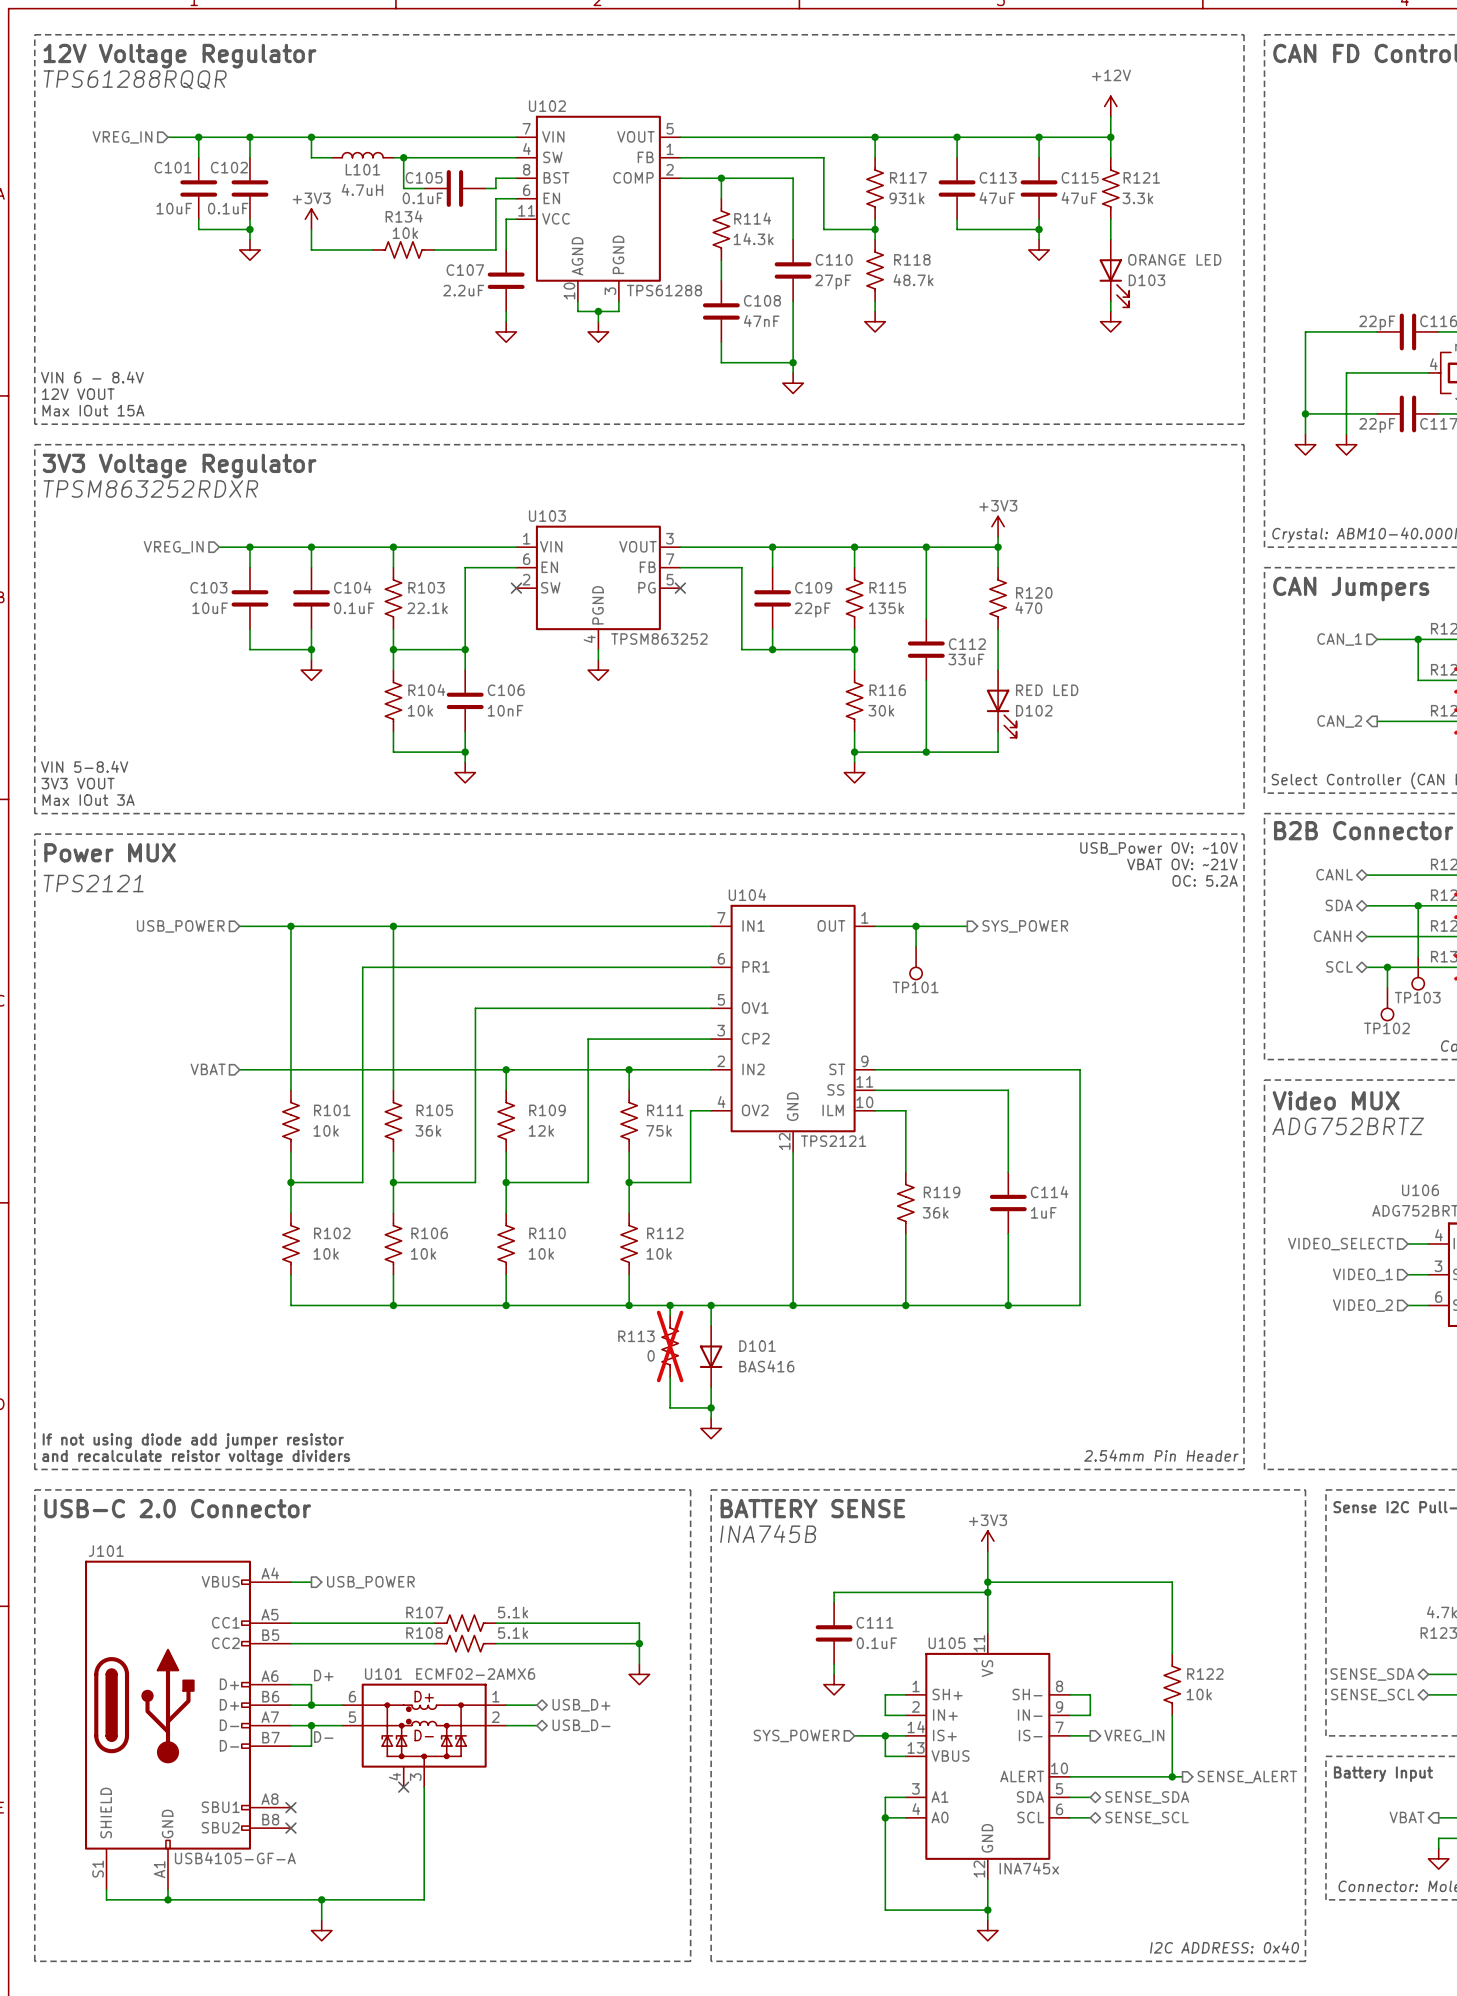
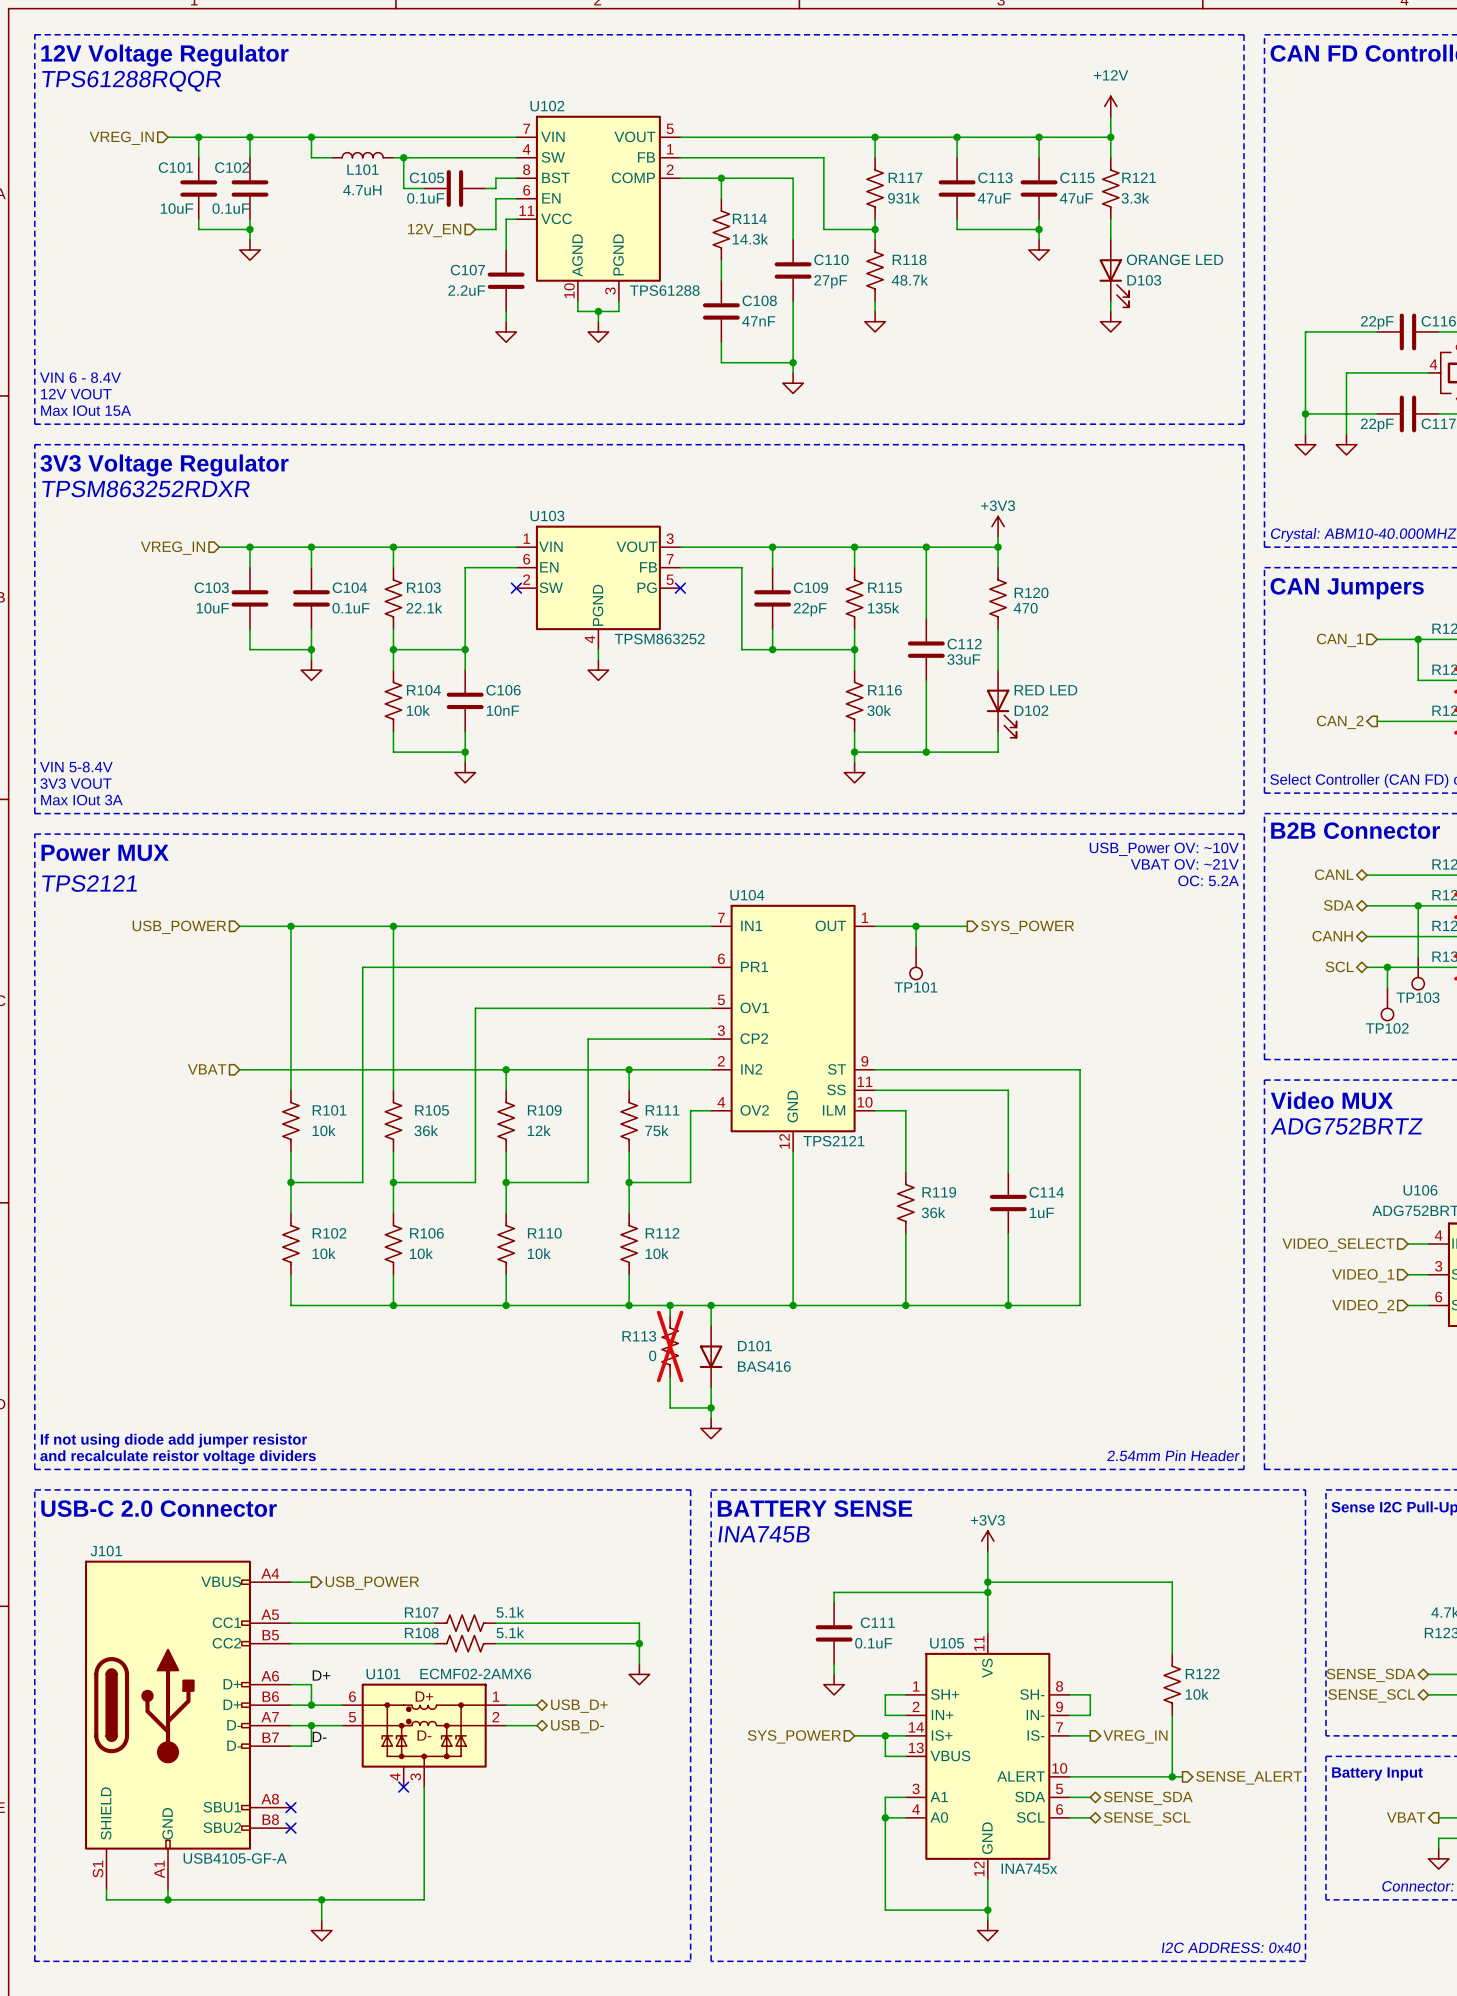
power symbol: +3V3 (311, 219) -> none
wire: (311, 229) (311, 249) (372, 249) -> none
hierarchical label: none -> 12V_EN (434, 230)
wire: (495, 229) (495, 249) (434, 249) -> (495, 229) (475, 229)
R134: 10k (403, 249) -> none

